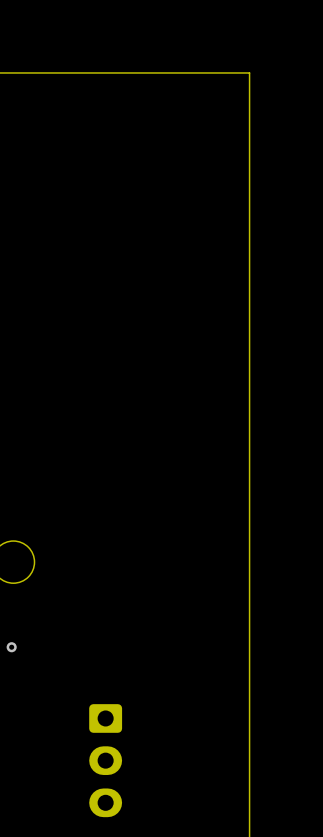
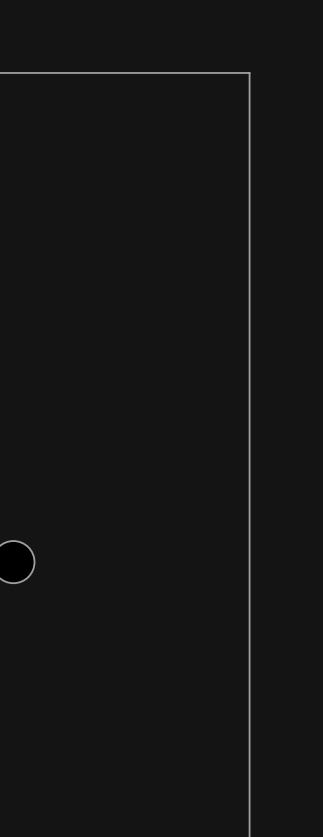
via: (11, 647) -> none
part: (105, 760) -> none

